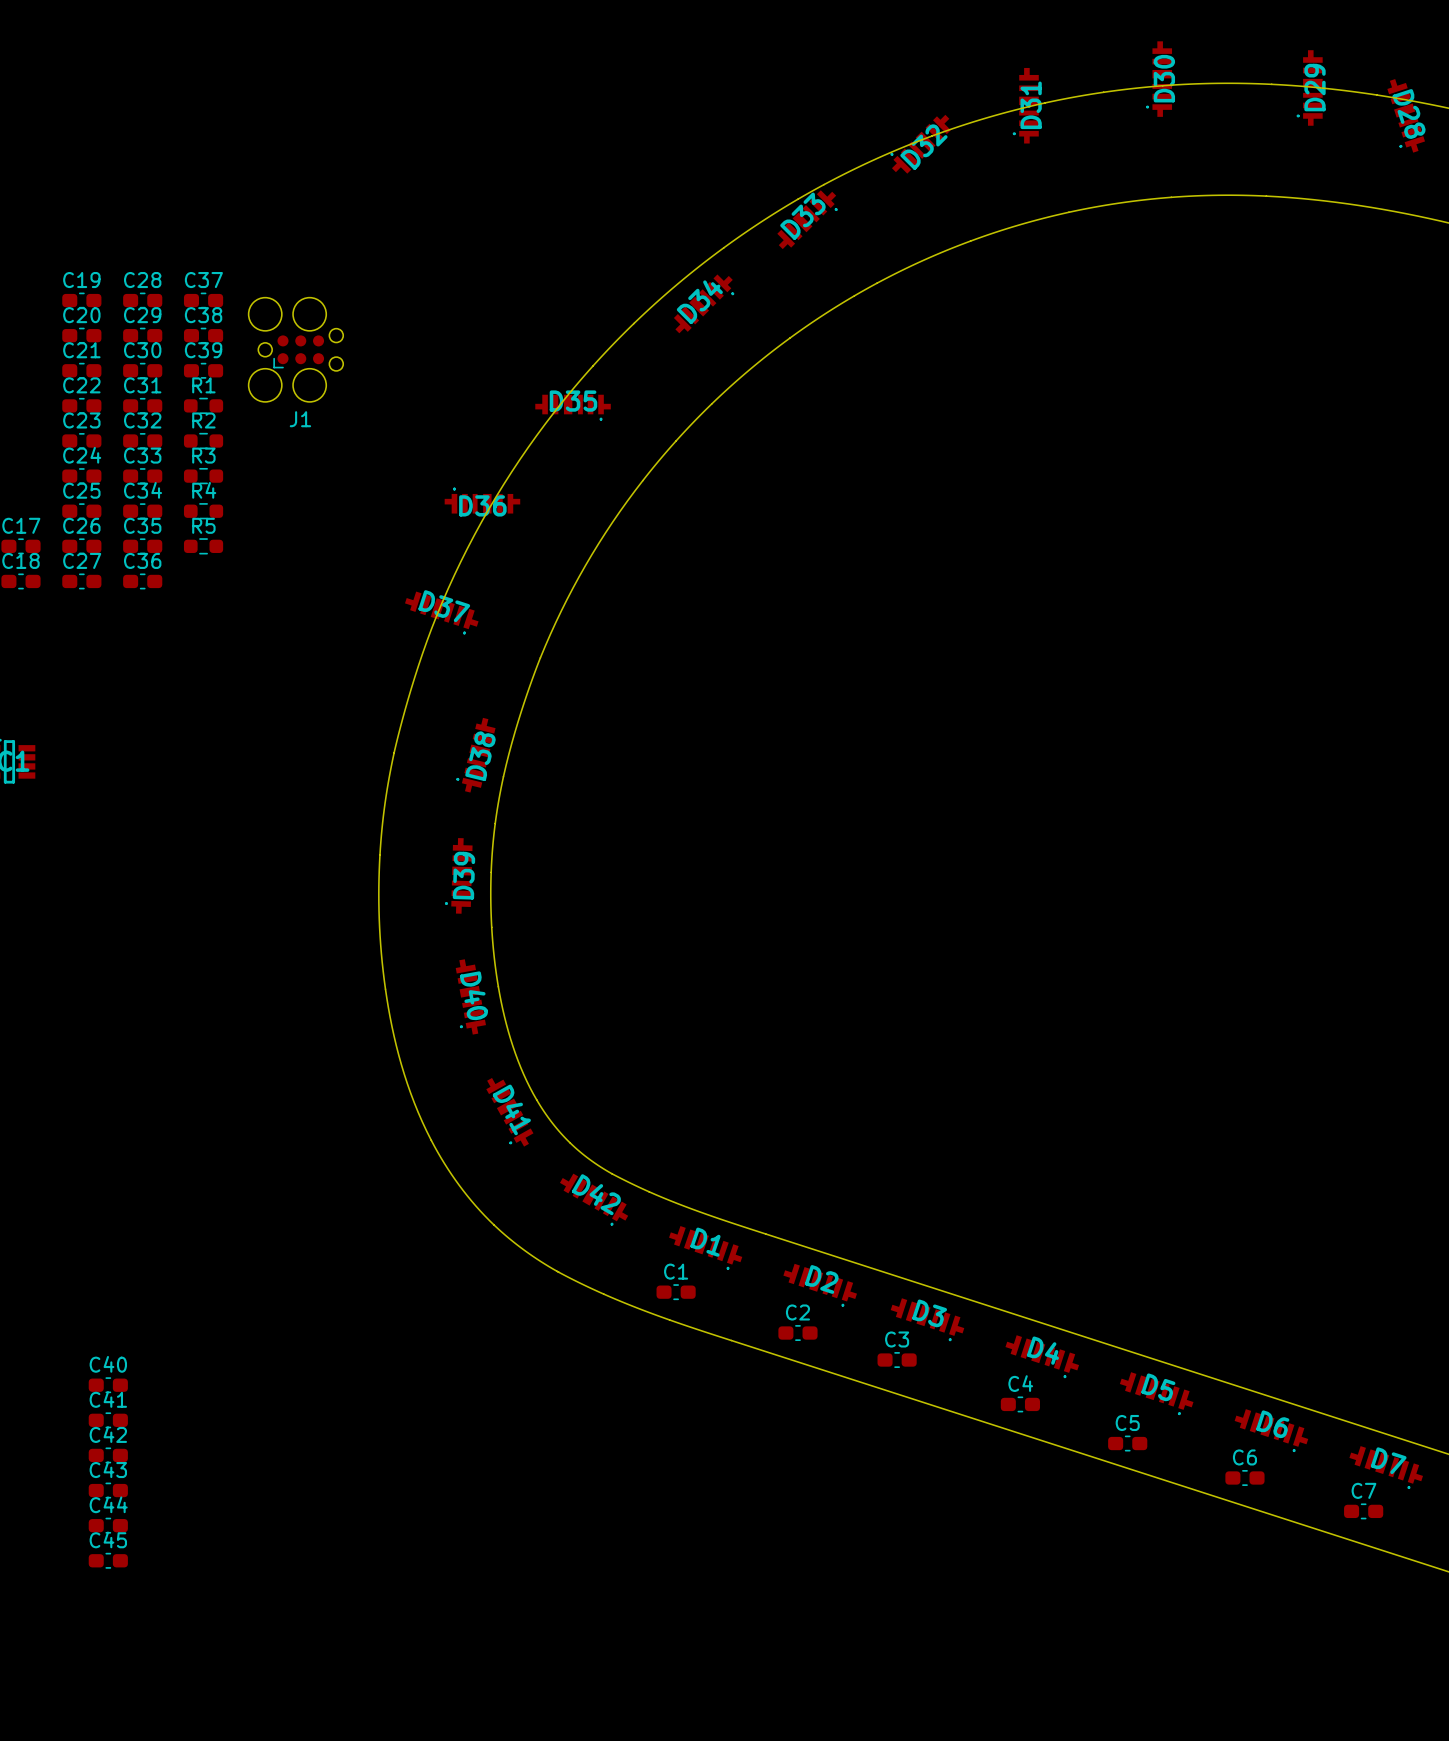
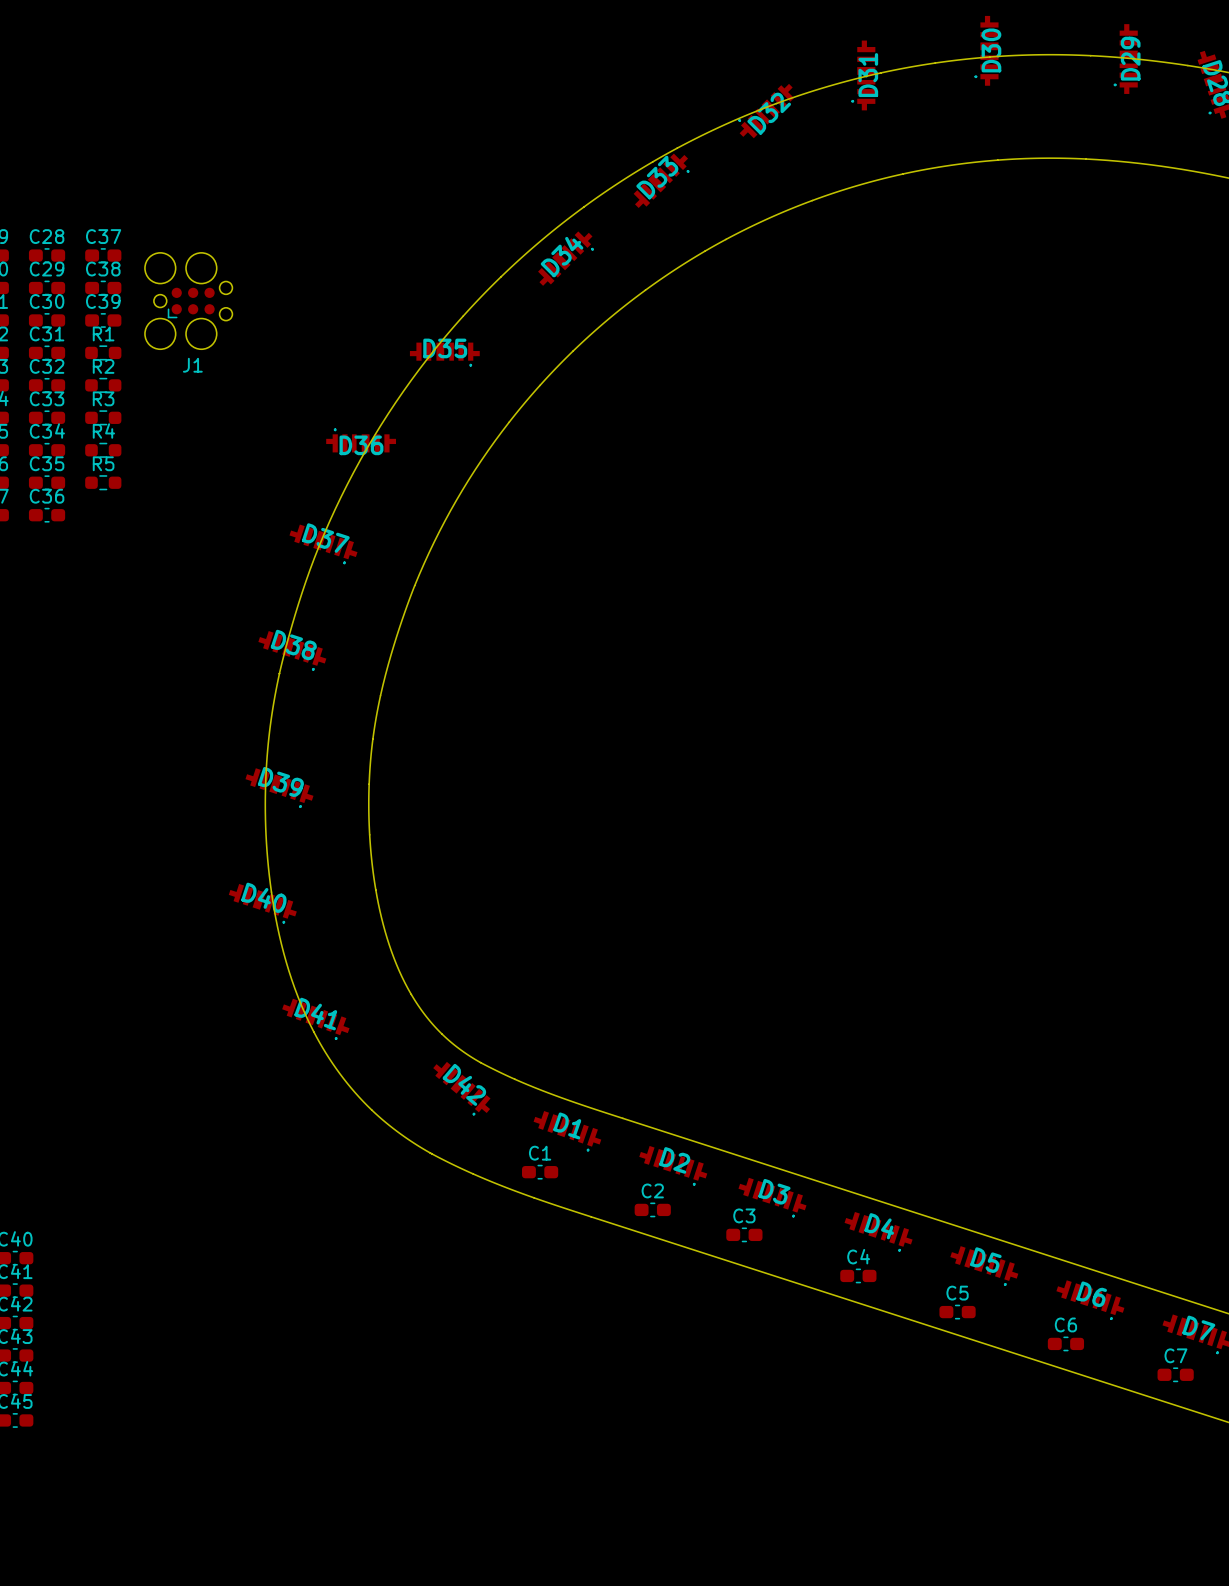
D38 rotation: 0° (475, 755) -> 85.8° counterclockwise (292, 650)
D38 position: (475, 755) -> (292, 650)
D39 rotation: 0° (458, 875) -> 73.6° counterclockwise (279, 788)
D39 position: (458, 875) -> (279, 788)
D40 rotation: 0° (470, 996) -> 61.8° counterclockwise (262, 903)
D40 position: (470, 996) -> (262, 903)
D41 rotation: 0° (509, 1112) -> 40.8° counterclockwise (315, 1019)
D41 position: (509, 1112) -> (315, 1019)
D42 rotation: 0° (594, 1199) -> 10° clockwise (461, 1088)

